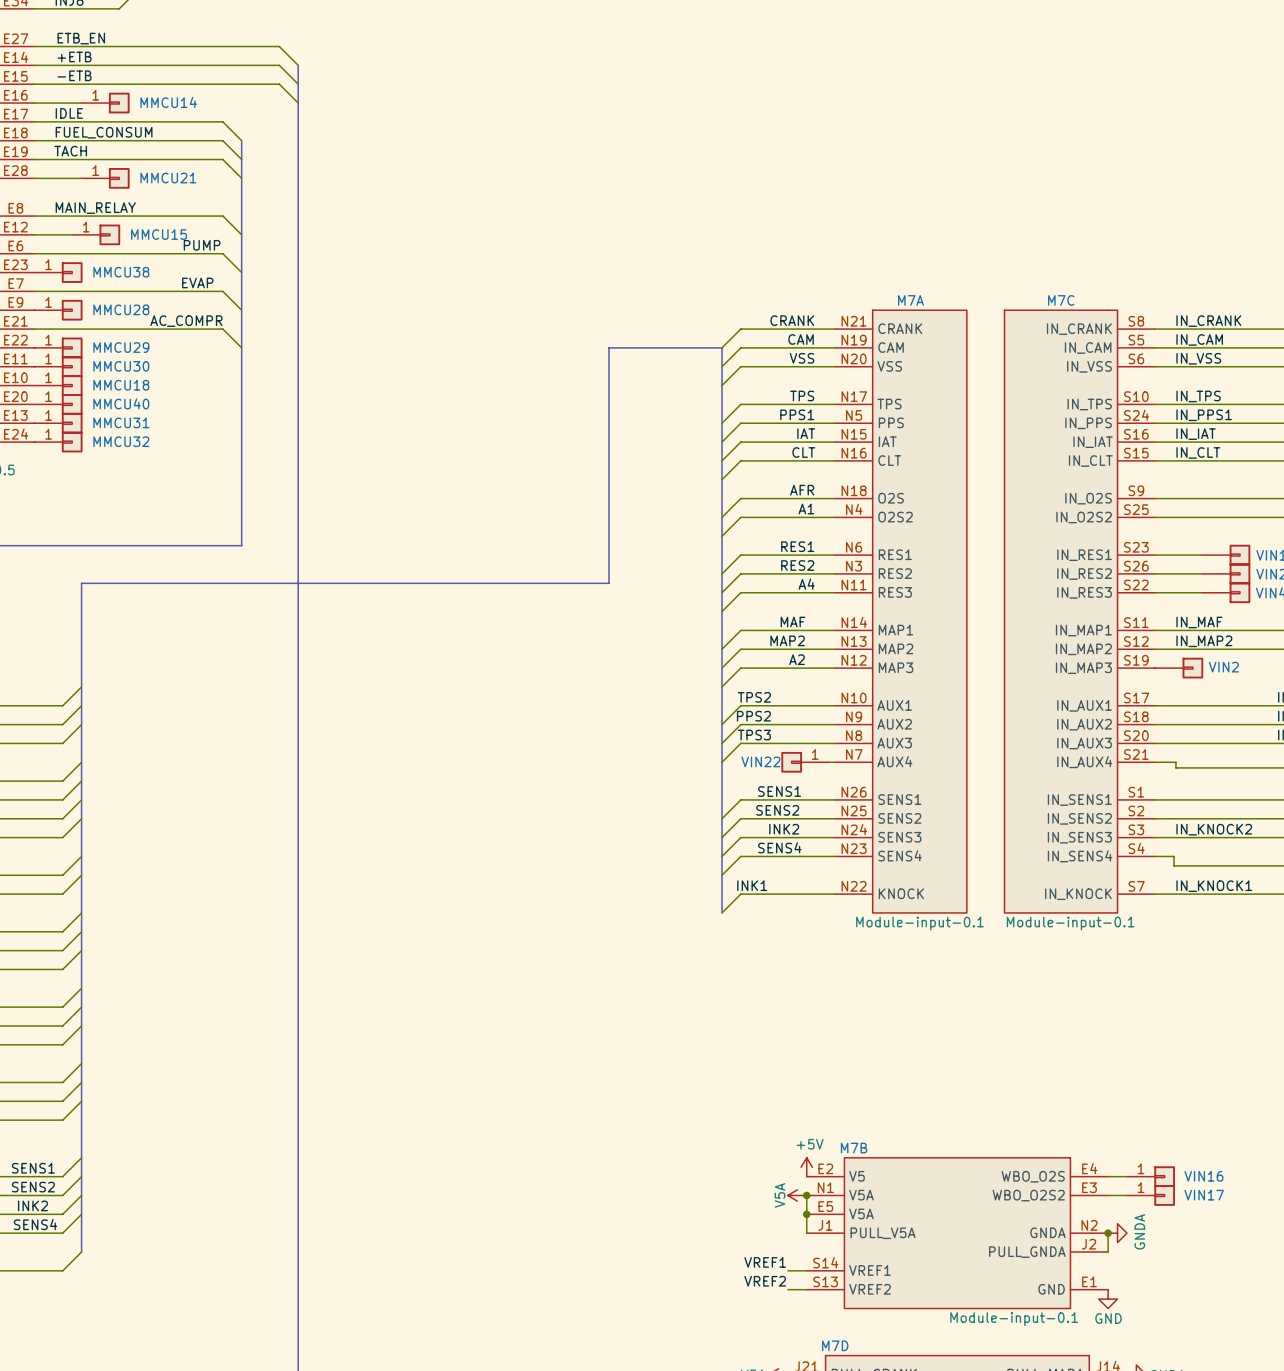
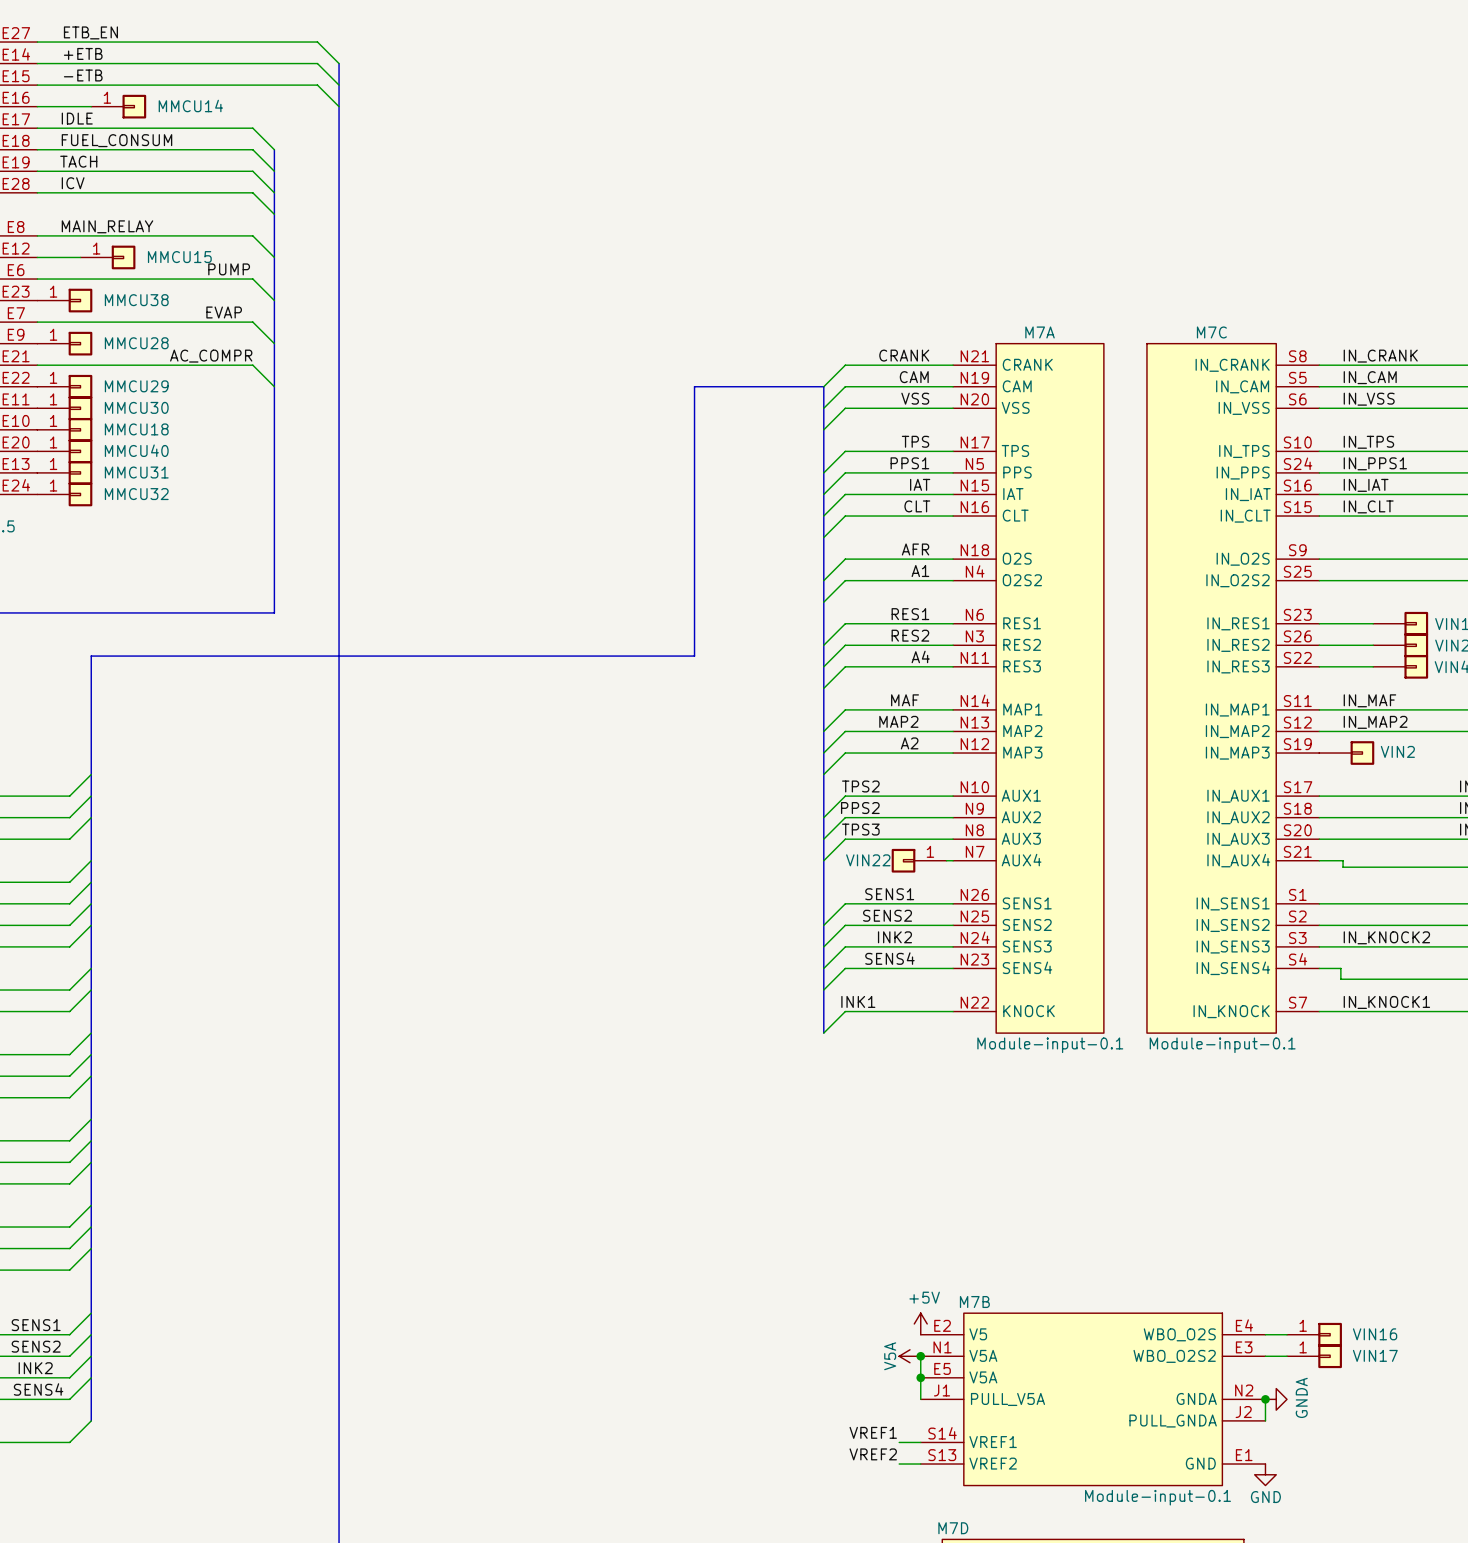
label: none -> ICV (73, 183)
wire: none -> (91, 192) (252, 192) (274, 214)
MMCU21: (105, 178) -> none

